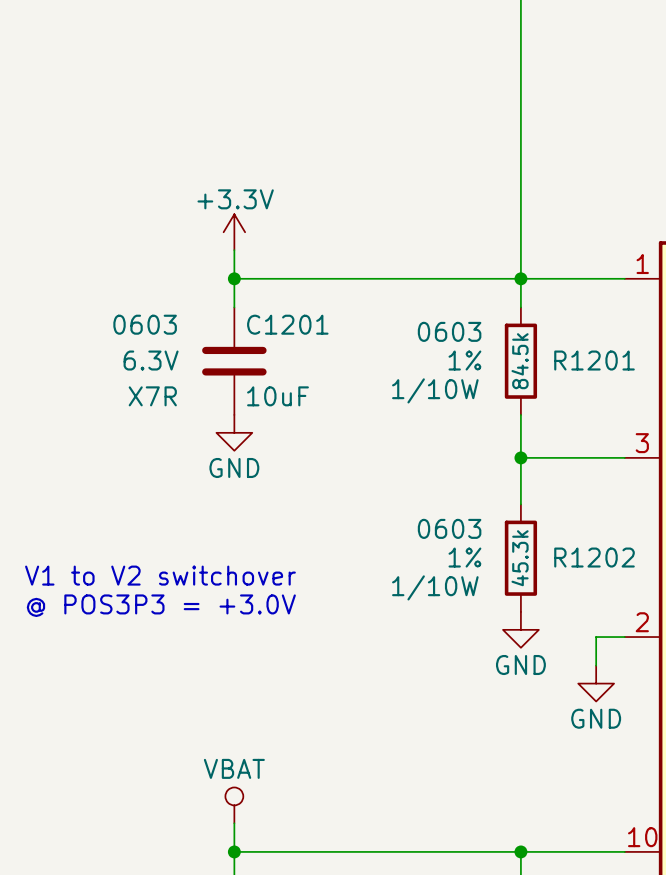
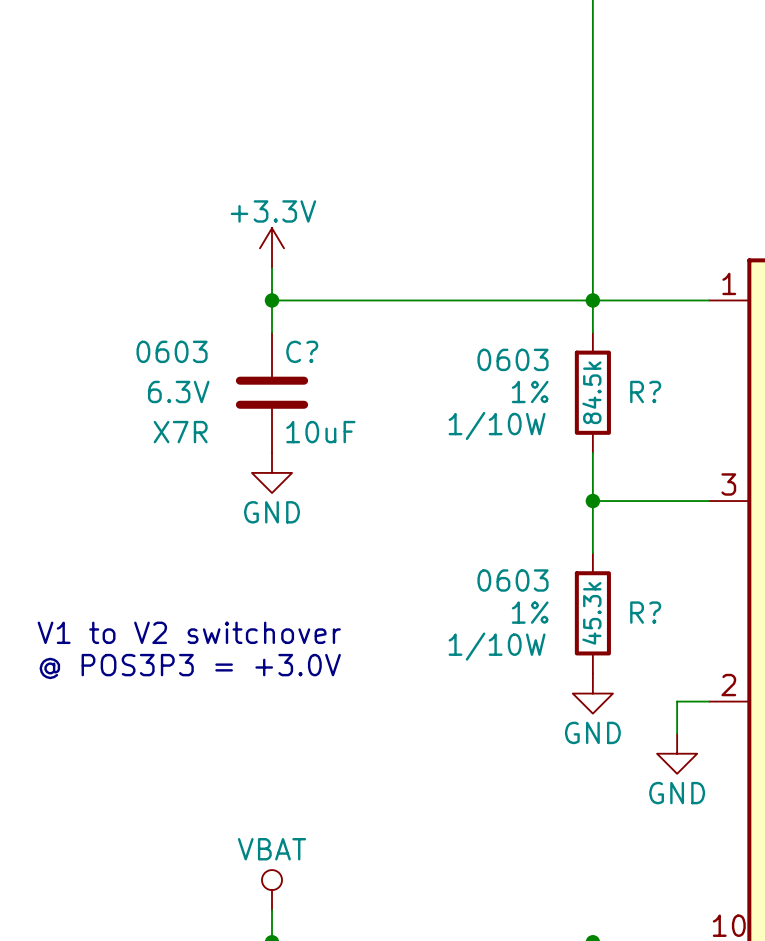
C1201 name: C1201 (287, 324) -> C? (302, 351)
R1201 name: R1201 (594, 360) -> R? (645, 391)
R1202 name: R1202 (594, 557) -> R? (645, 612)

